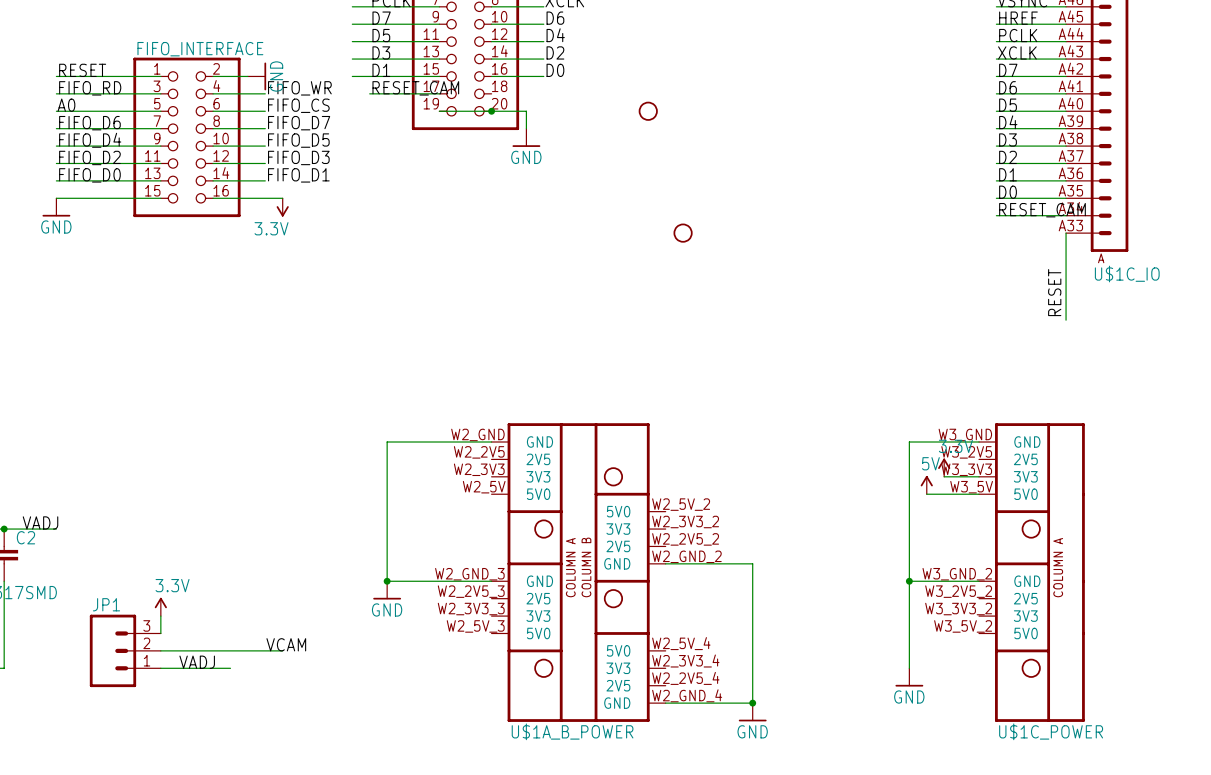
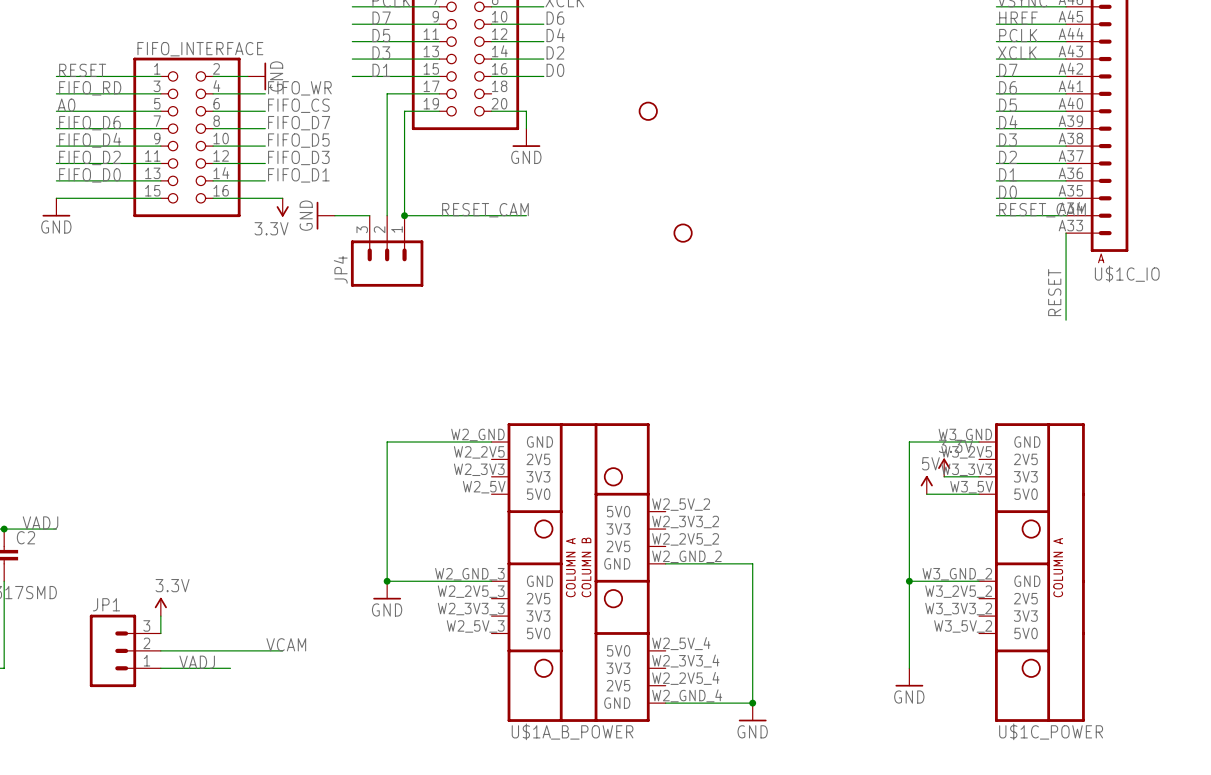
label position: RESET_CAM (415, 88) -> RESET_CAM (485, 210)
wire: (369, 93) (387, 93) -> (387, 215) (387, 93)
wire: (439, 111) (491, 111) -> (439, 111) (404, 111) (404, 215) (526, 215)
junction: (491, 111) -> none
power symbol: none -> GND (325, 215)
wire: none -> (334, 215) (369, 215)
junction: none -> (404, 215)
JP4: none -> (387, 251)

